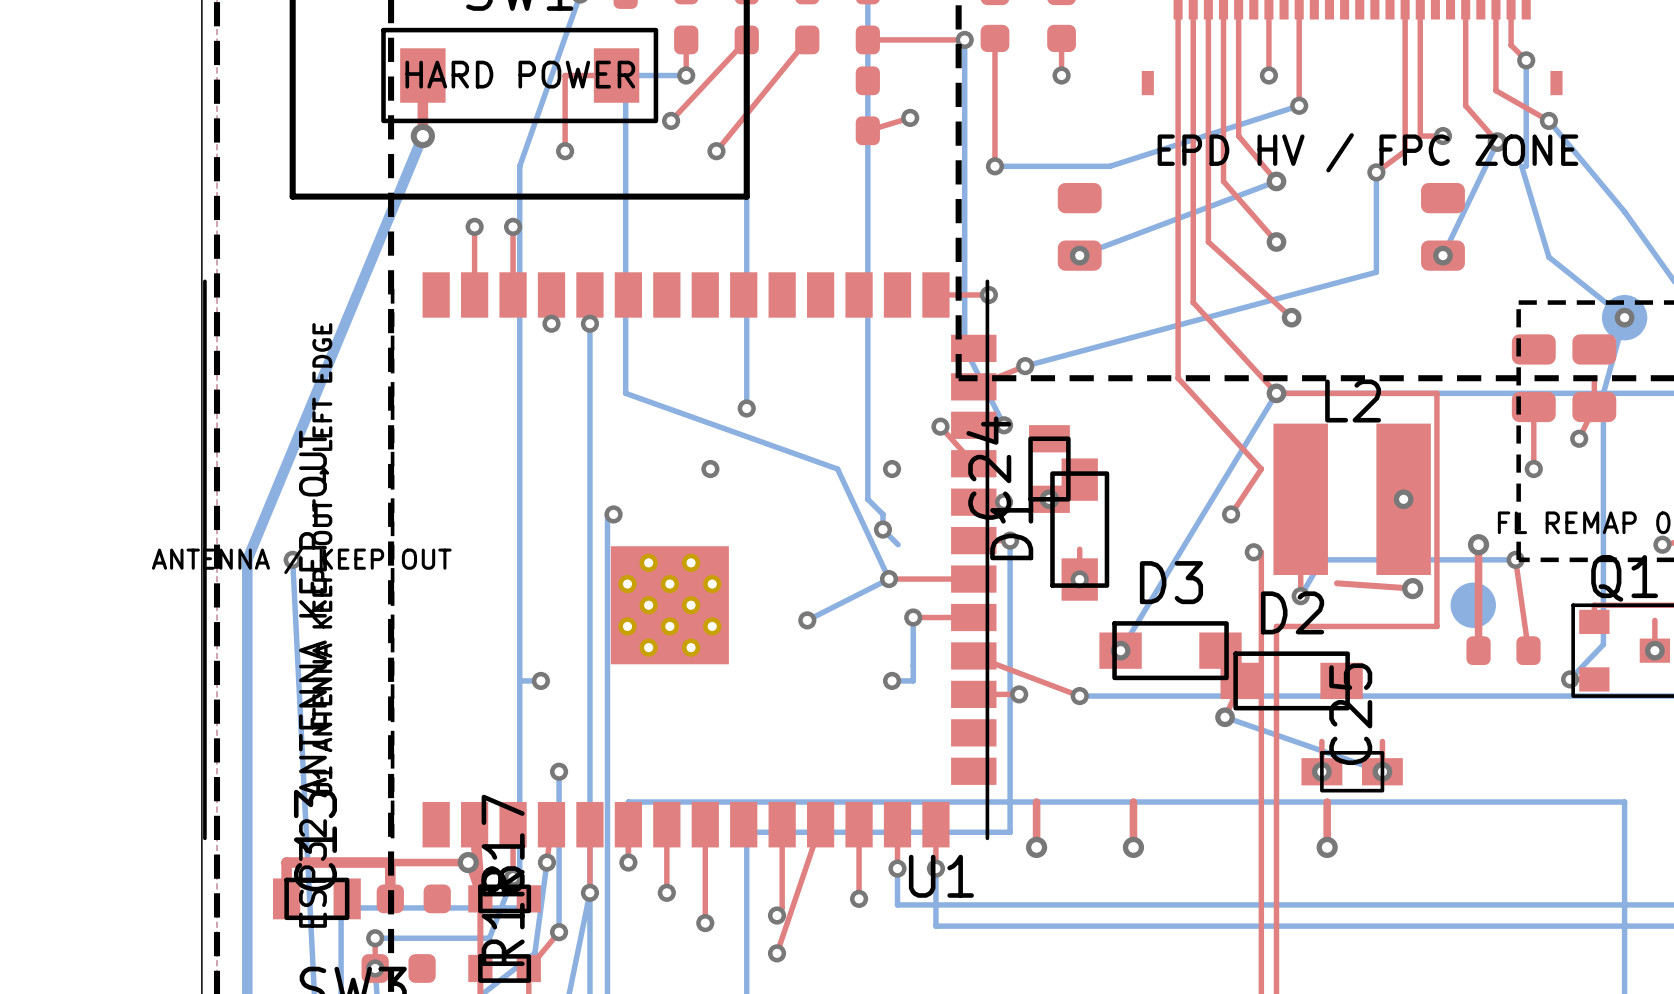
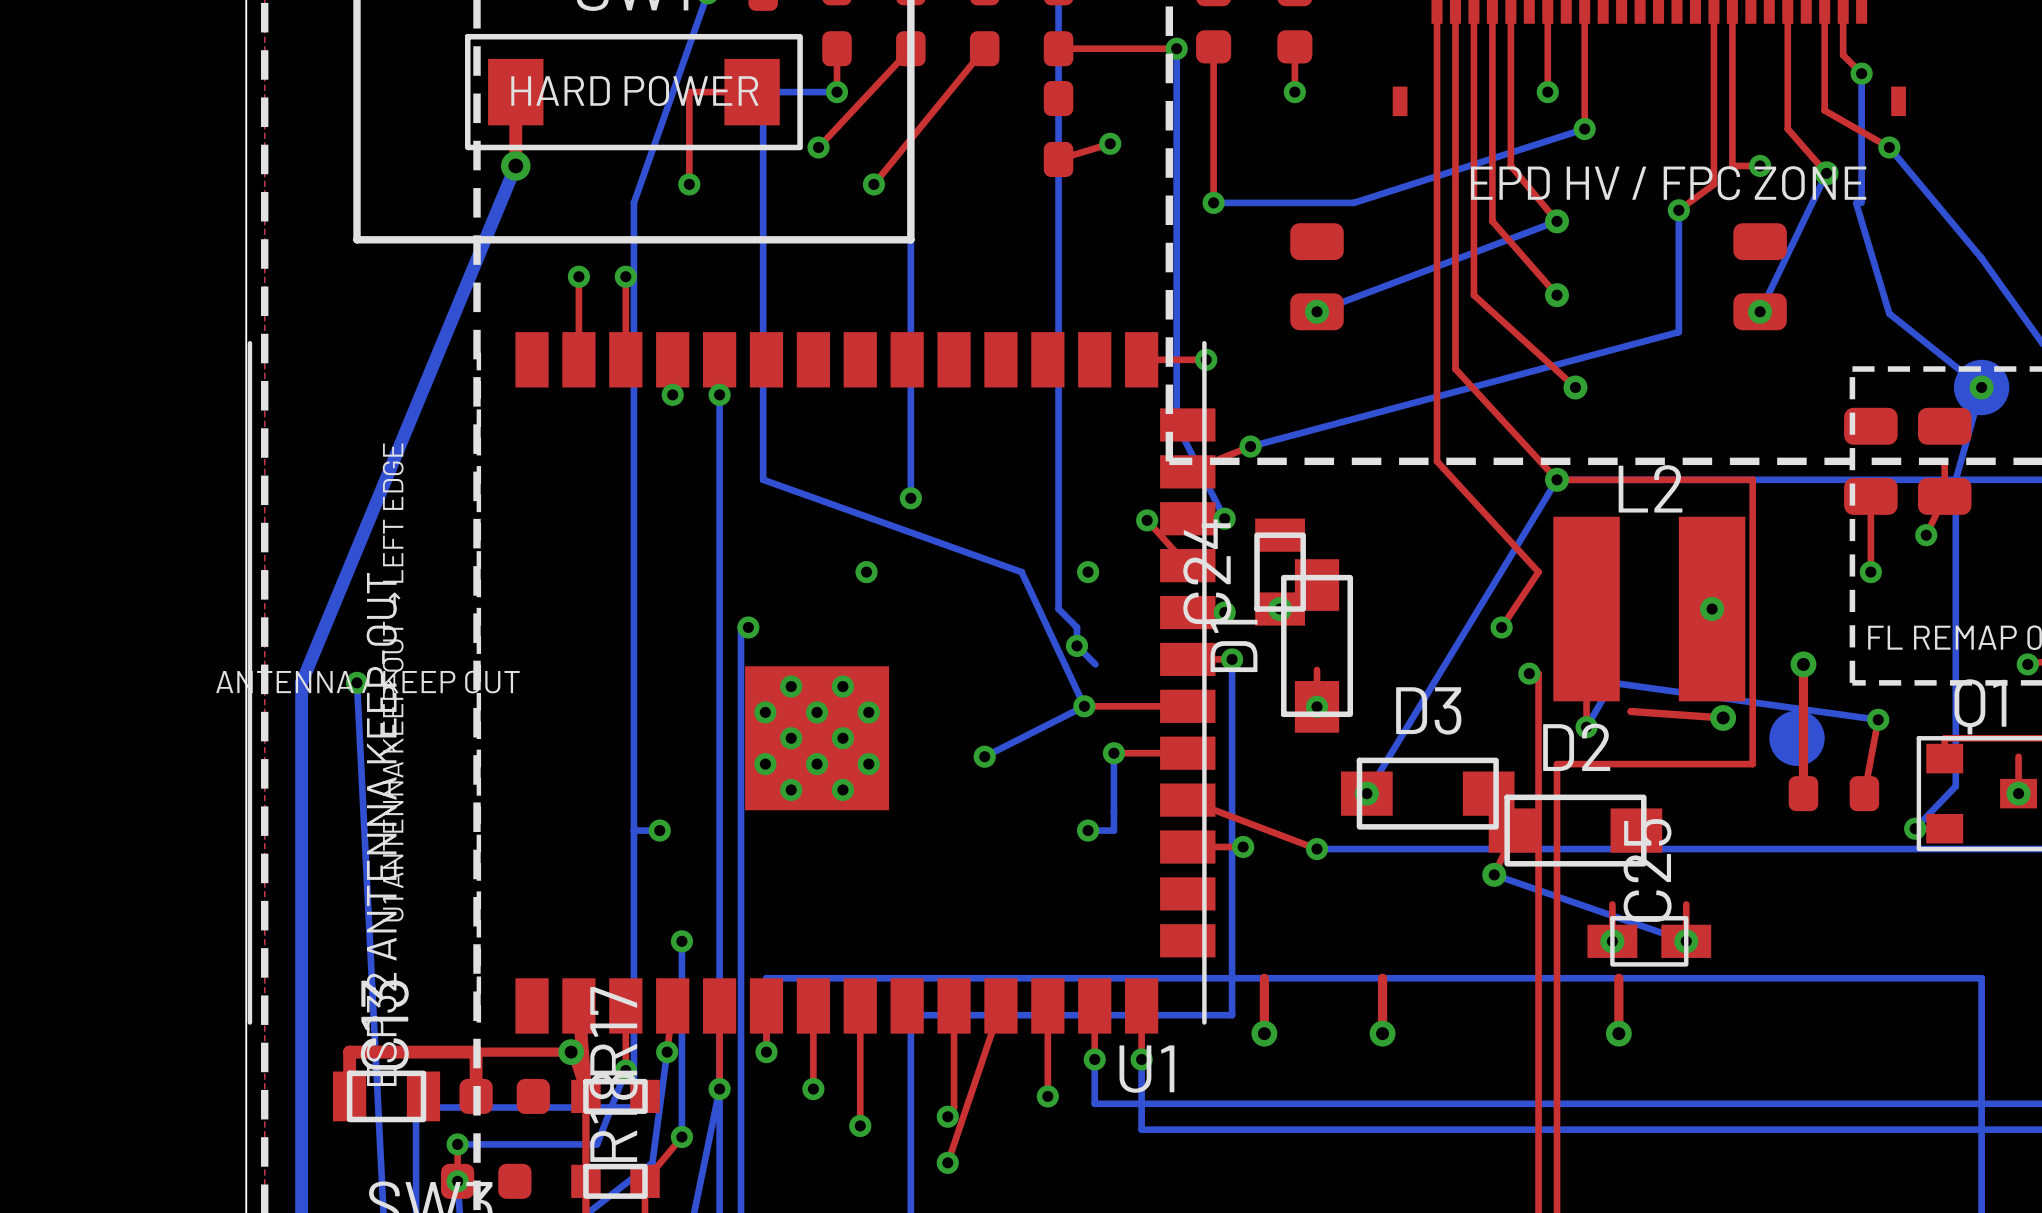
bottom track: (1321, 559) (1515, 559) -> (1612, 682) (1878, 719)
top track: (1515, 559) (1528, 650) -> (1878, 719) (1864, 793)
via position: (1515, 559) -> (1878, 719)

